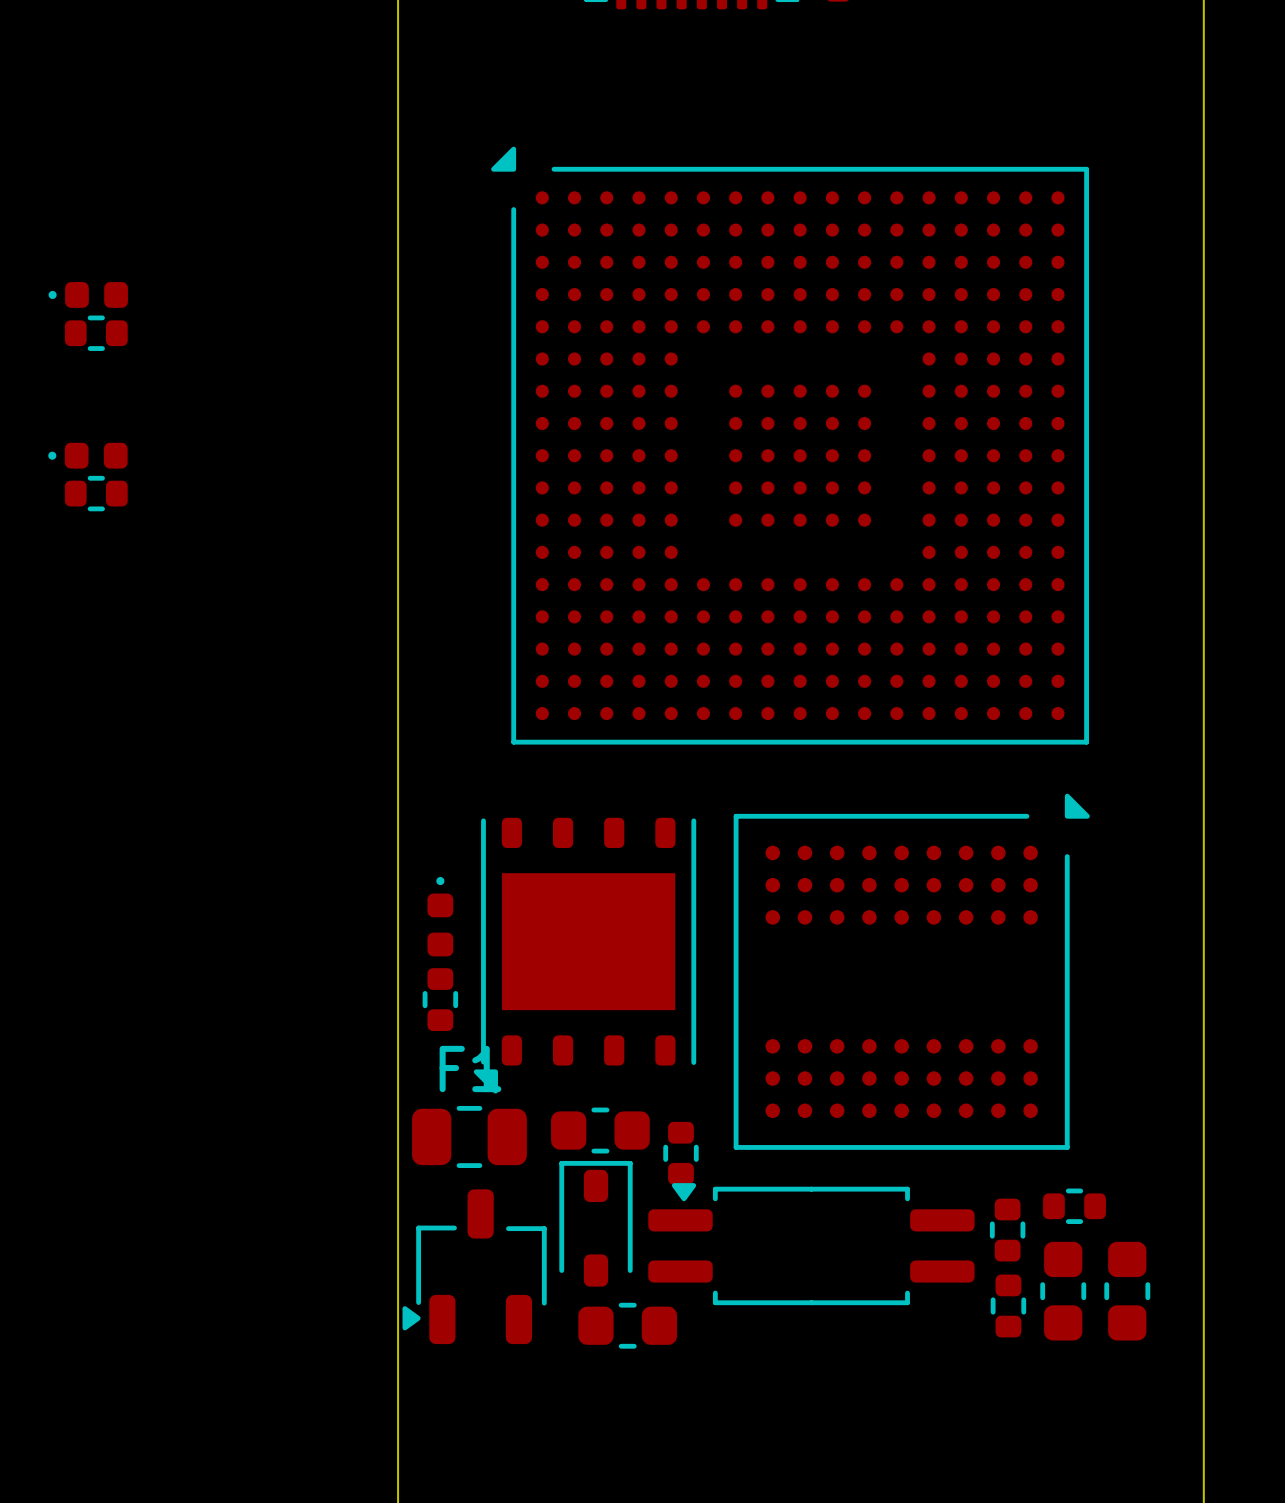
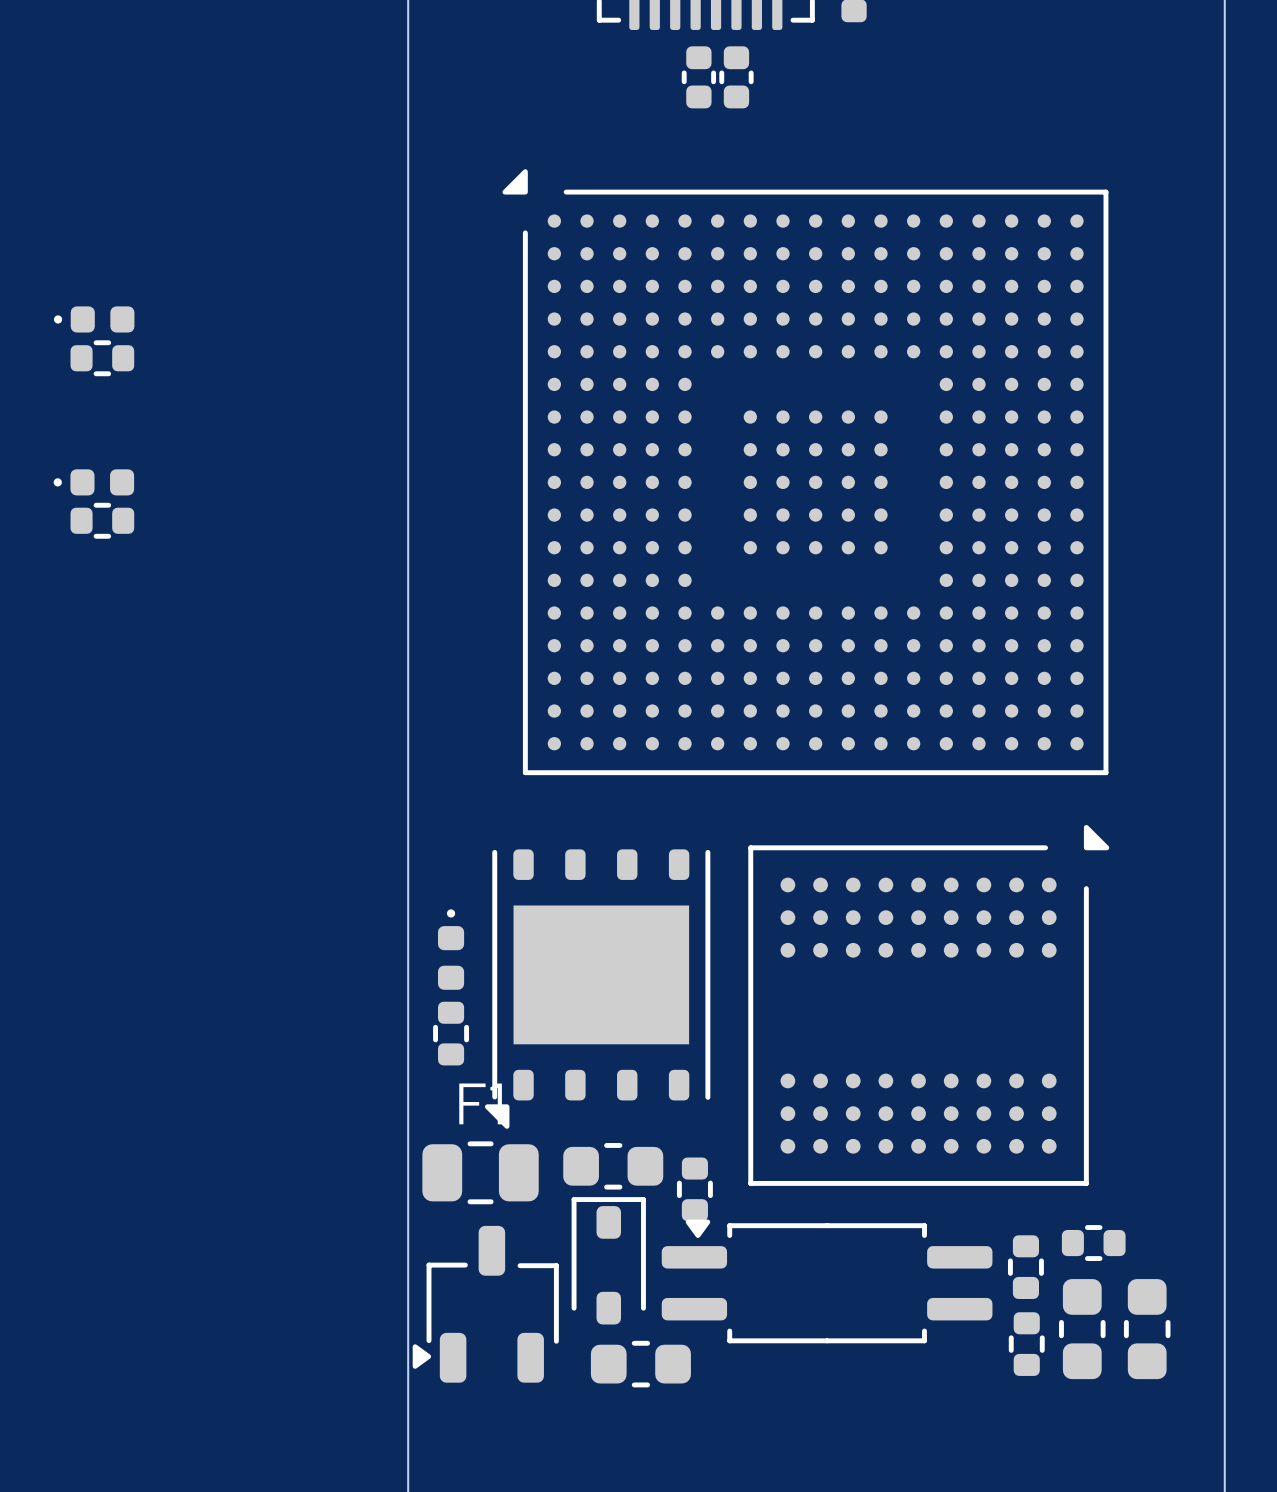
part: none -> (698, 77)
part: none -> (736, 77)

